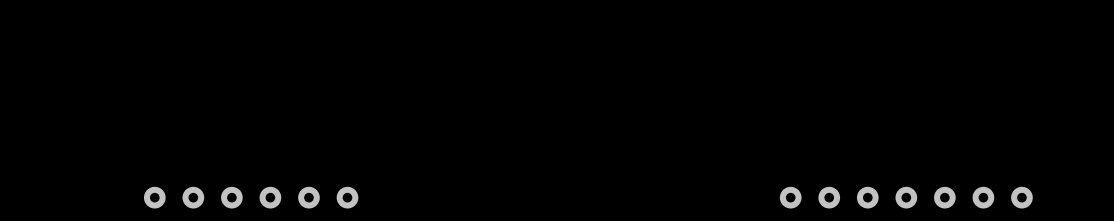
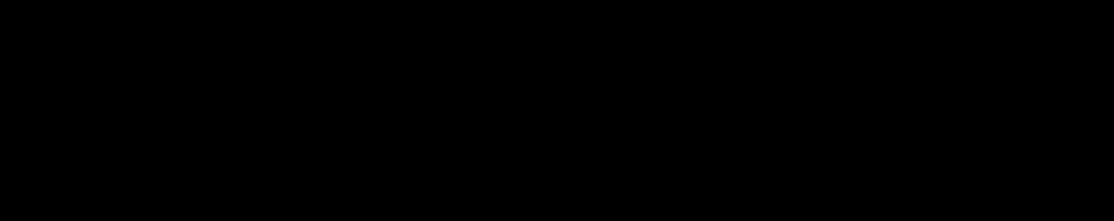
via: (154, 197) -> none
via: (193, 197) -> none
via: (231, 197) -> none
via: (270, 197) -> none
via: (308, 197) -> none
via: (347, 197) -> none
via: (790, 197) -> none
via: (829, 197) -> none
via: (867, 197) -> none
via: (906, 197) -> none
via: (944, 197) -> none
via: (983, 197) -> none
via: (1021, 197) -> none

